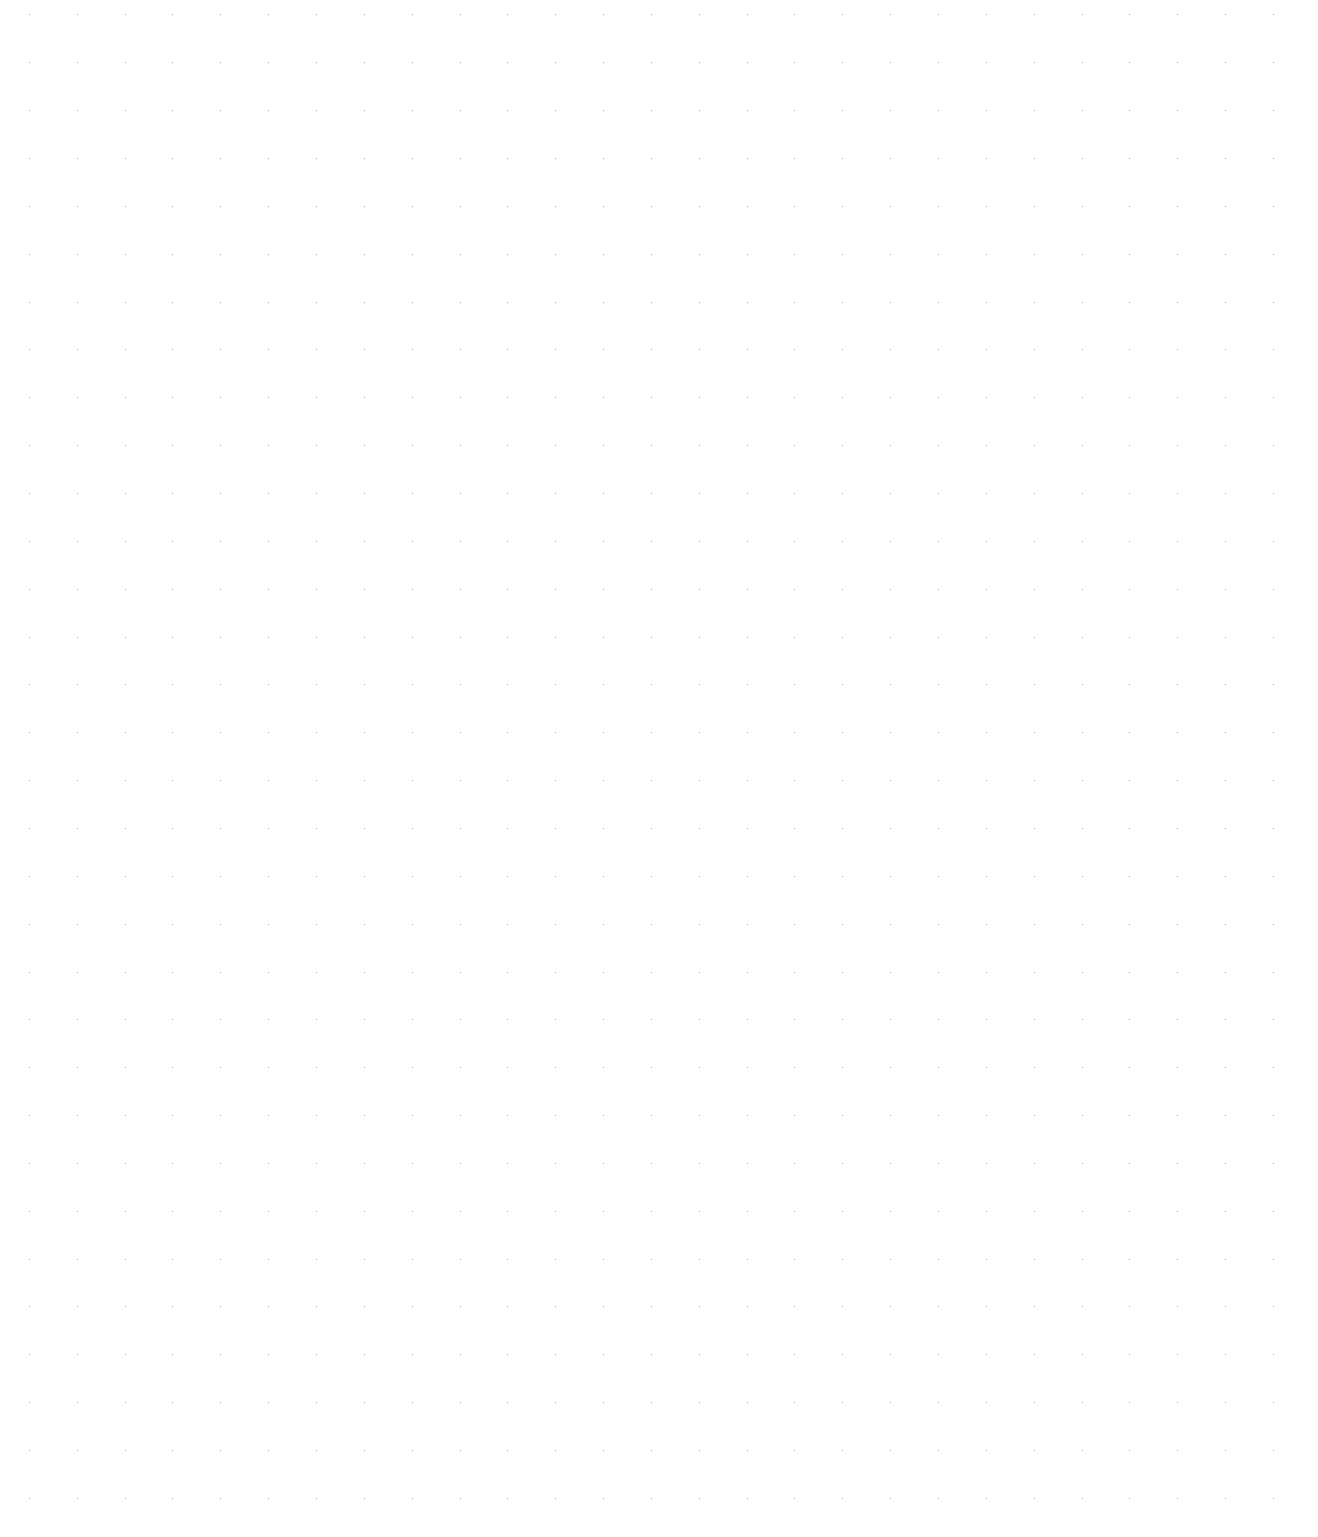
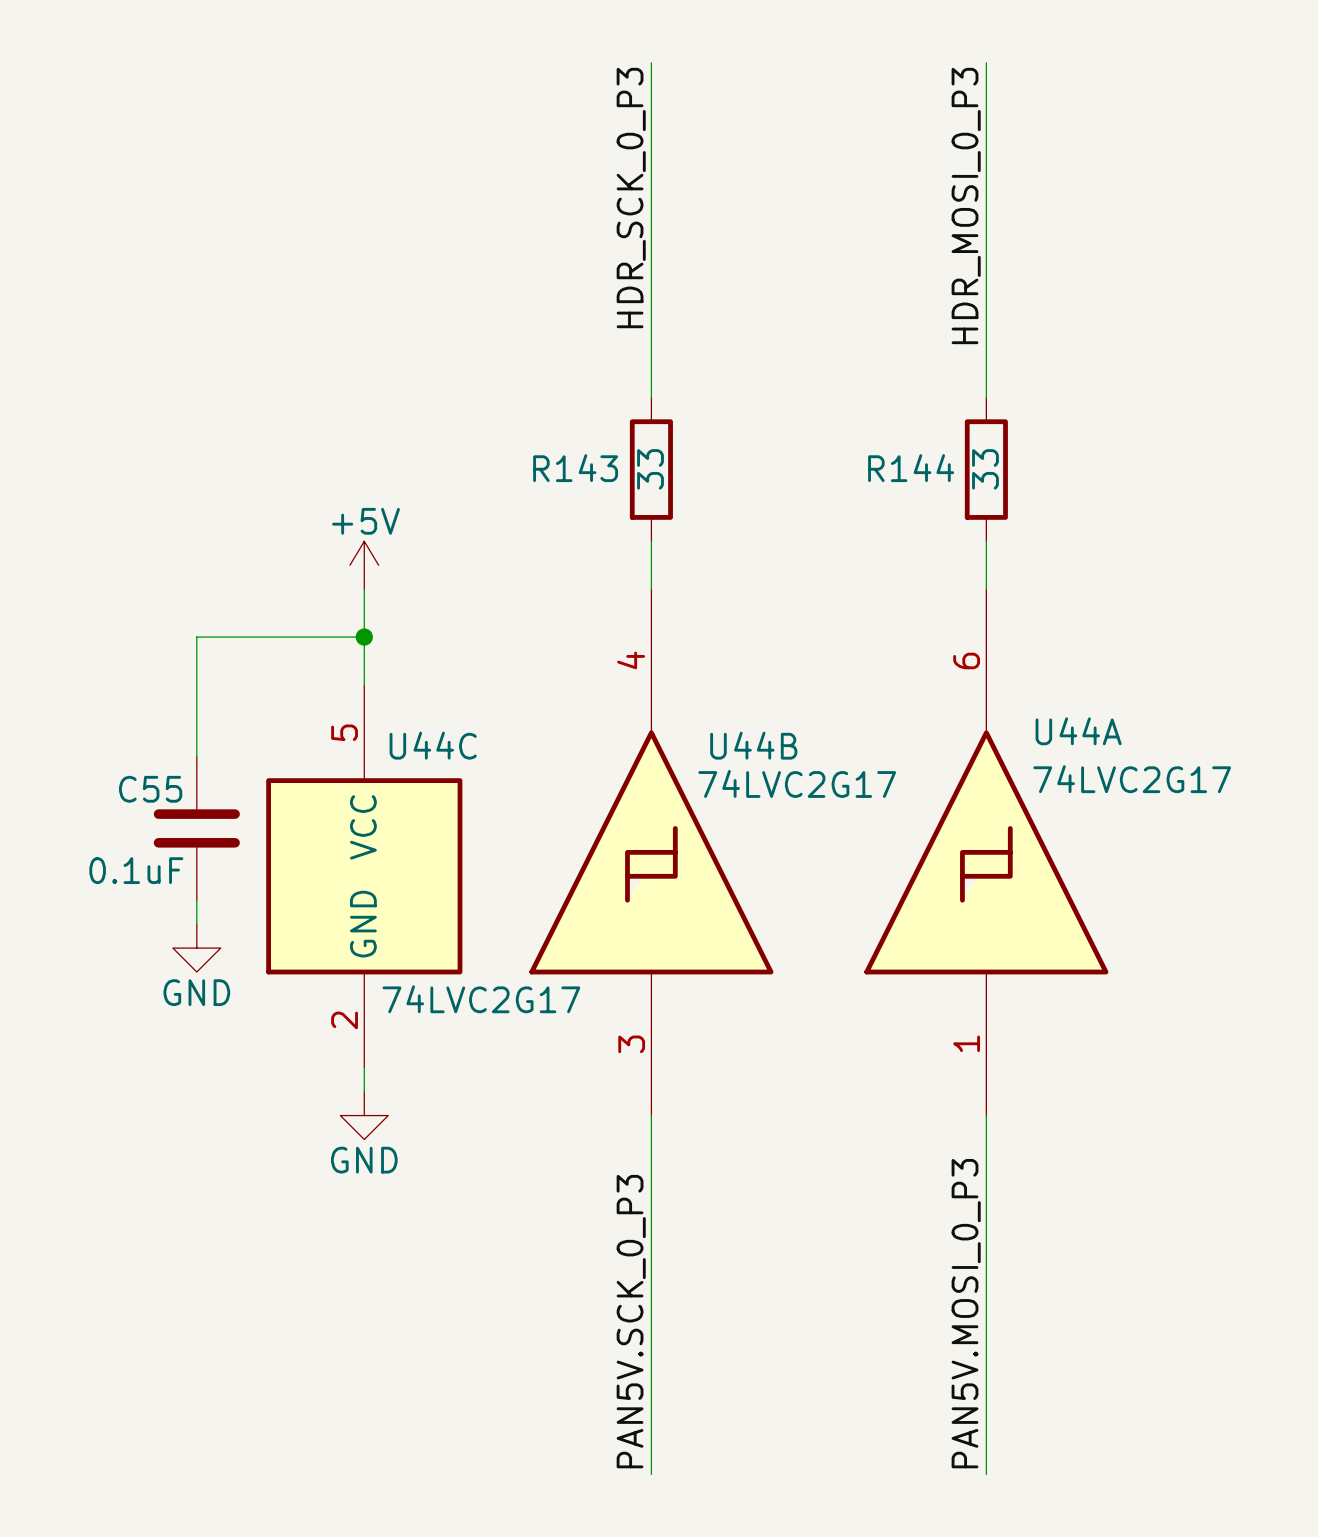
wire: none -> (651, 62) (651, 397)
wire: none -> (986, 62) (986, 397)
label: none -> HDR_SCK_0_P3 (631, 198)
label: none -> HDR_MOSI_0_P3 (966, 205)
R143: none -> 33 (651, 469)
R144: none -> 33 (986, 469)
wire: none -> (651, 541) (651, 589)
wire: none -> (986, 541) (986, 589)
power symbol: none -> +5V (364, 565)
wire: none -> (364, 589) (364, 684)
wire: none -> (364, 637) (196, 637) (196, 756)
junction: none -> (364, 637)
C55: none -> 0.1uF (196, 828)
U44B: none -> 74LVC2G17 (651, 852)
U44A: none -> 74LVC2G17 (986, 852)
U44C: none -> 74LVC2G17 (364, 876)
wire: none -> (196, 900) (196, 924)
power symbol: none -> GND (196, 948)
wire: none -> (364, 1067) (364, 1091)
power symbol: none -> GND (364, 1115)
wire: none -> (651, 1115) (651, 1474)
wire: none -> (986, 1115) (986, 1474)
label: none -> PAN5V.MOSI_0_P3 (966, 1313)
label: none -> PAN5V.SCK_0_P3 (631, 1321)

